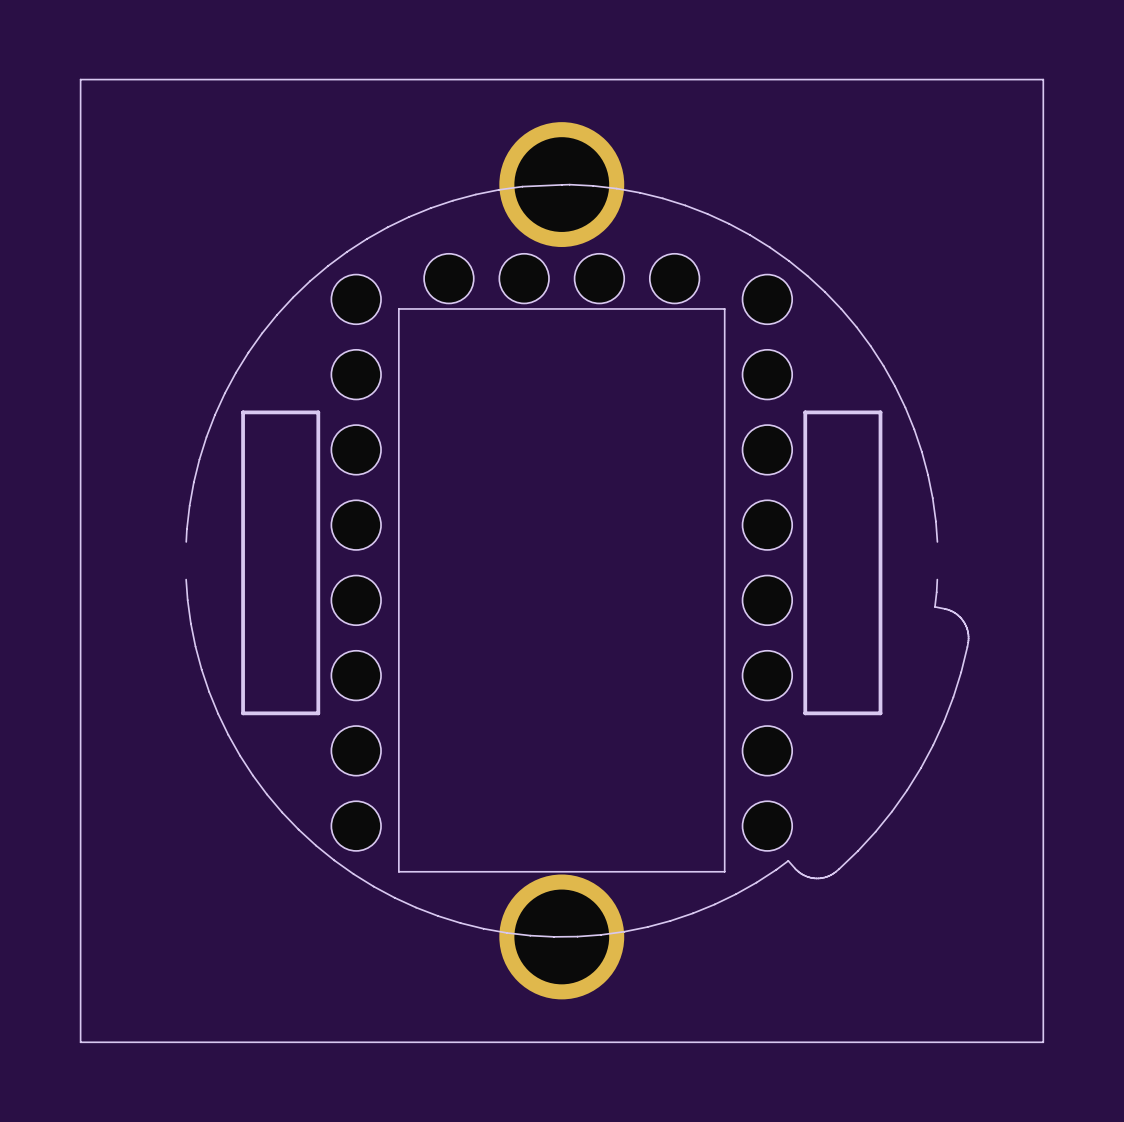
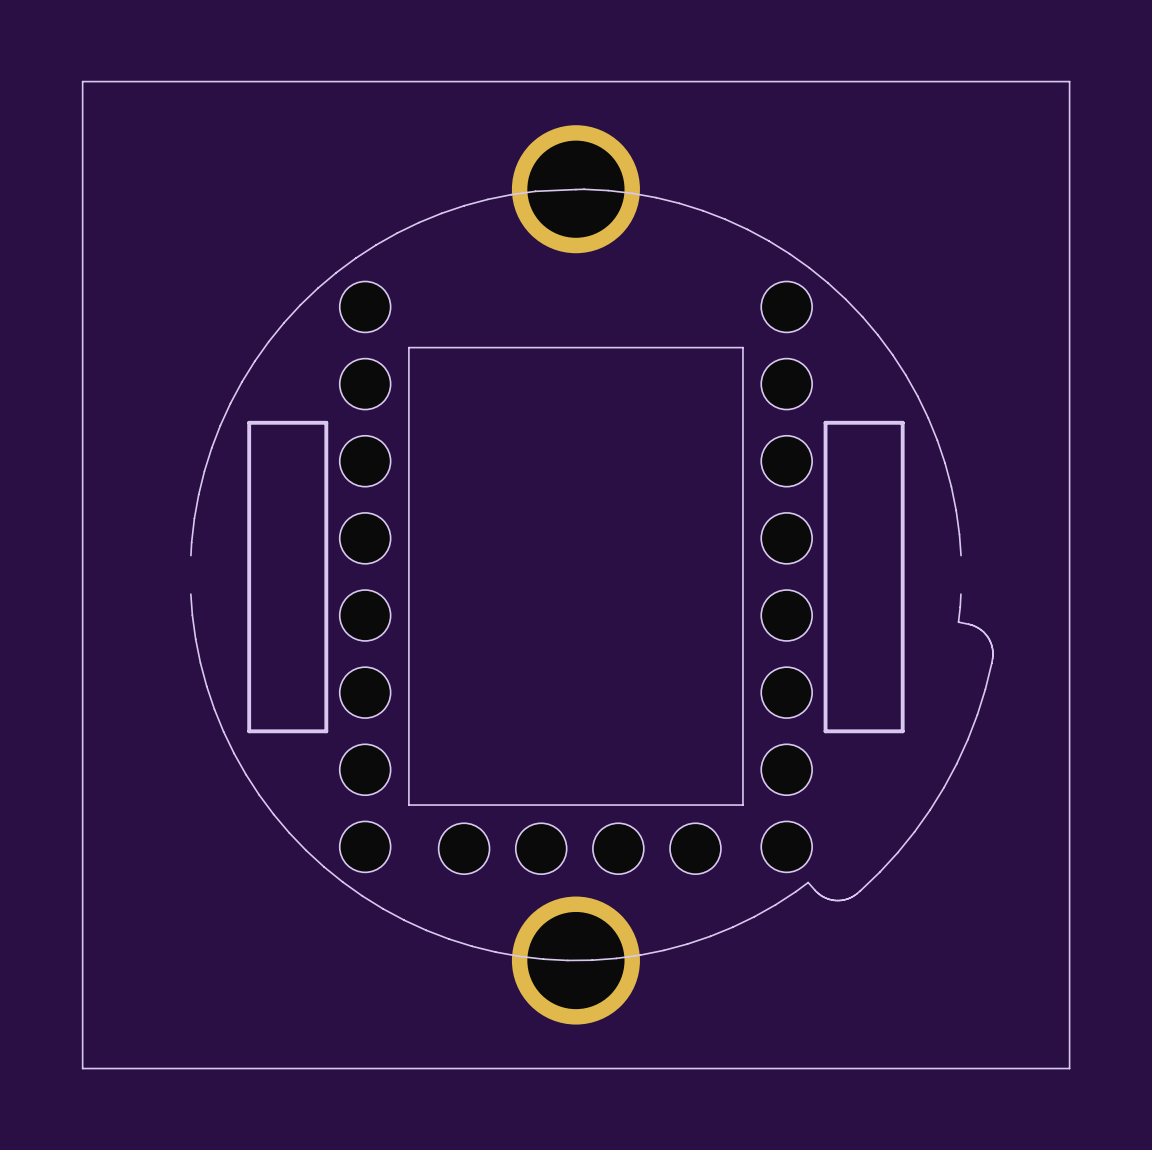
part position: (561, 278) -> (579, 848)
board edge: (724, 339) (724, 308) (398, 308) (398, 339) -> (742, 347) (408, 347)
board edge: (724, 785) (724, 871) (398, 871) (398, 785) -> (742, 805) (408, 805)

